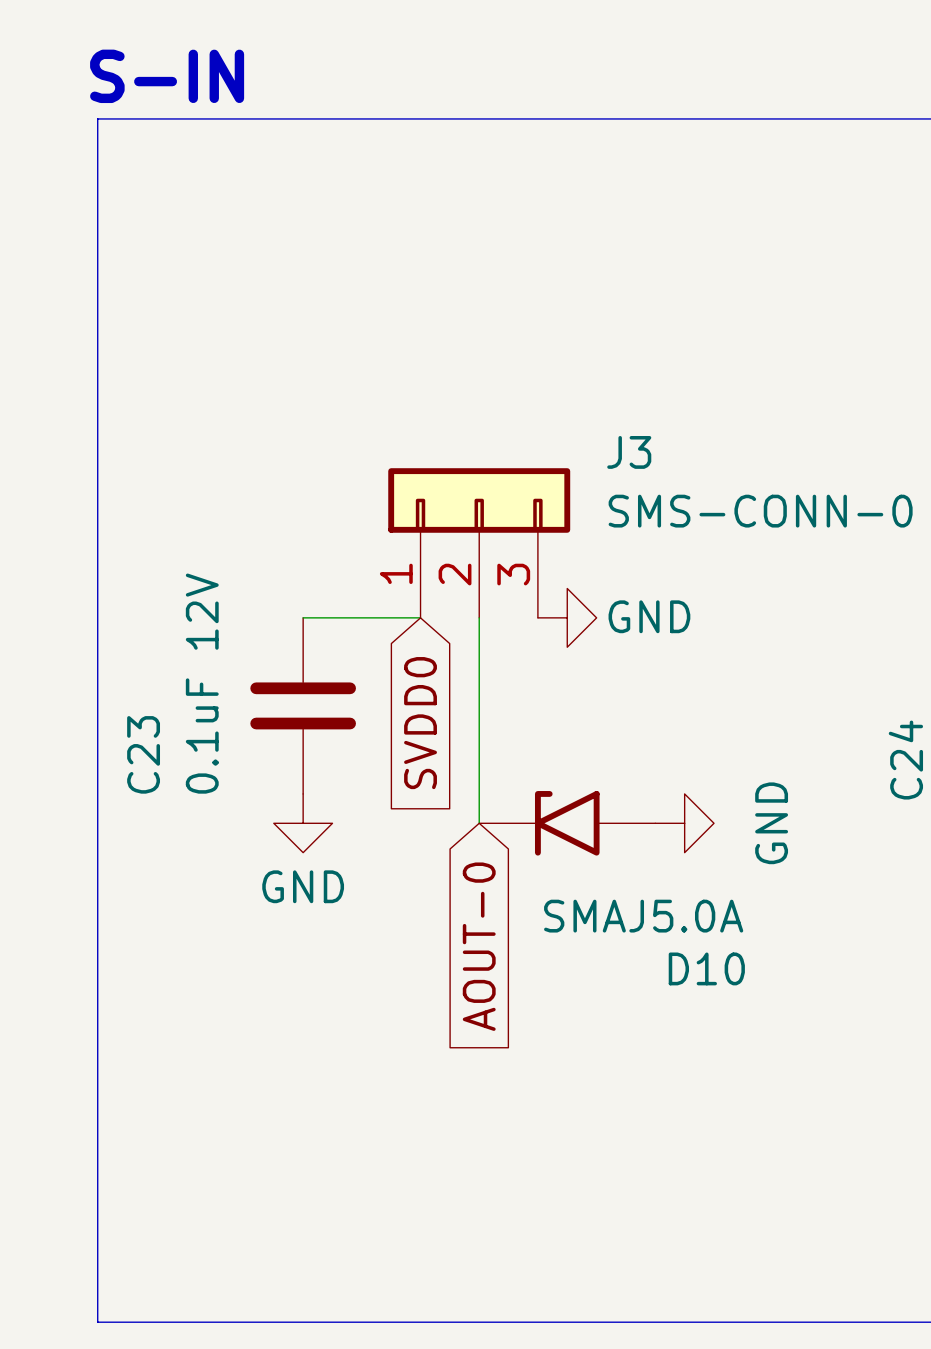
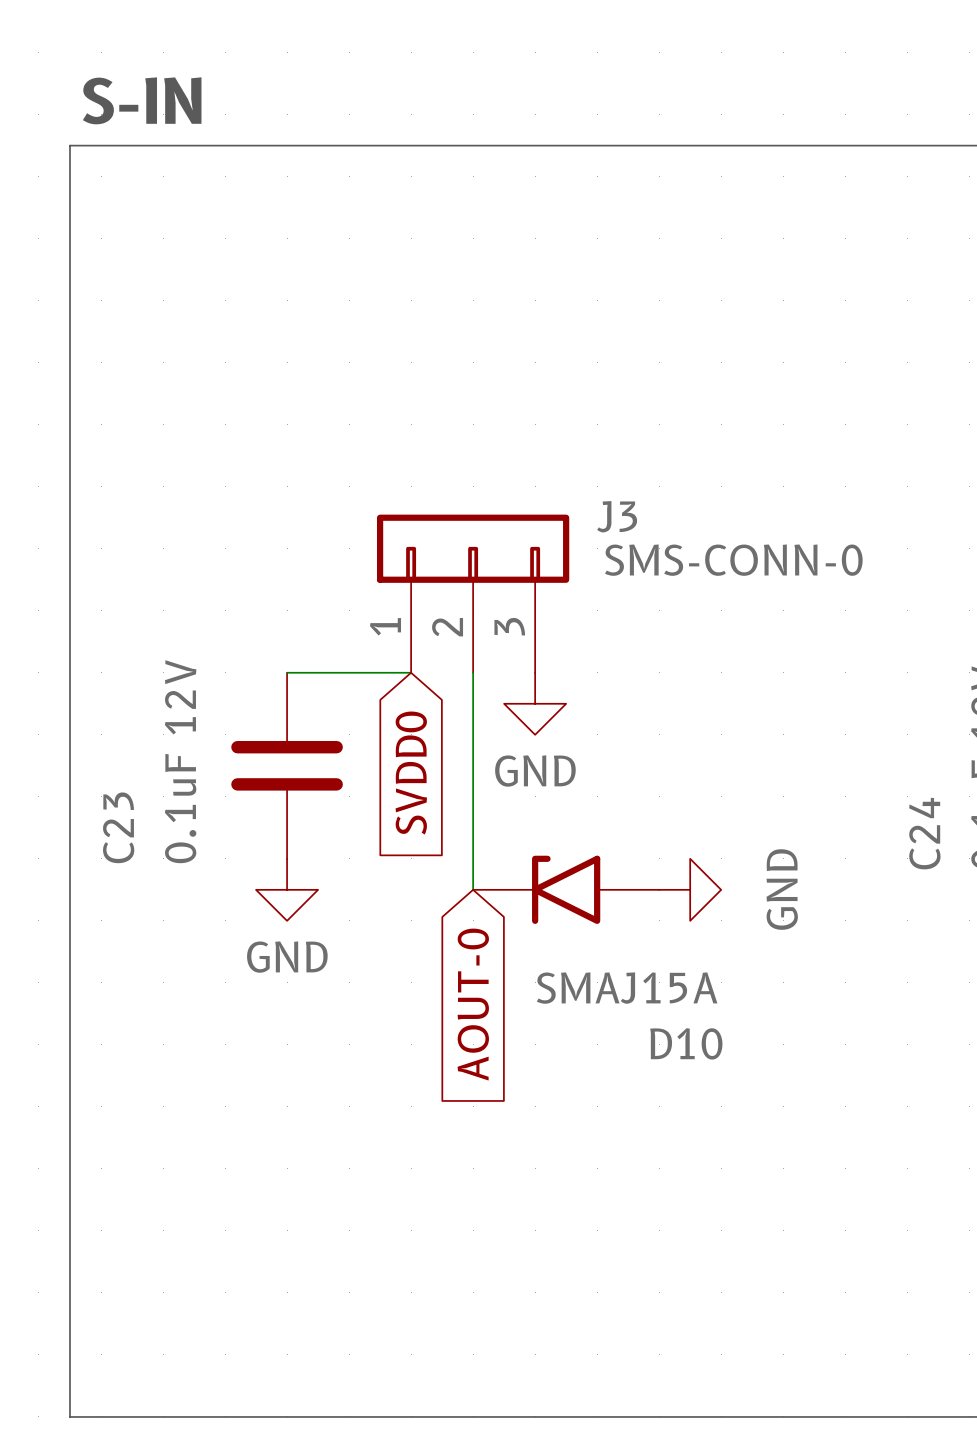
J3 name position: J3 (629, 452) -> J3 (617, 516)
power symbol rotation: 0° (567, 617) -> 90° clockwise (535, 703)
power symbol position: GND (567, 617) -> GND (535, 703)
D10 value: SMAJ5.0A (643, 916) -> SMAJ15A (627, 988)
D10 name position: D10 (706, 968) -> D10 (686, 1043)

